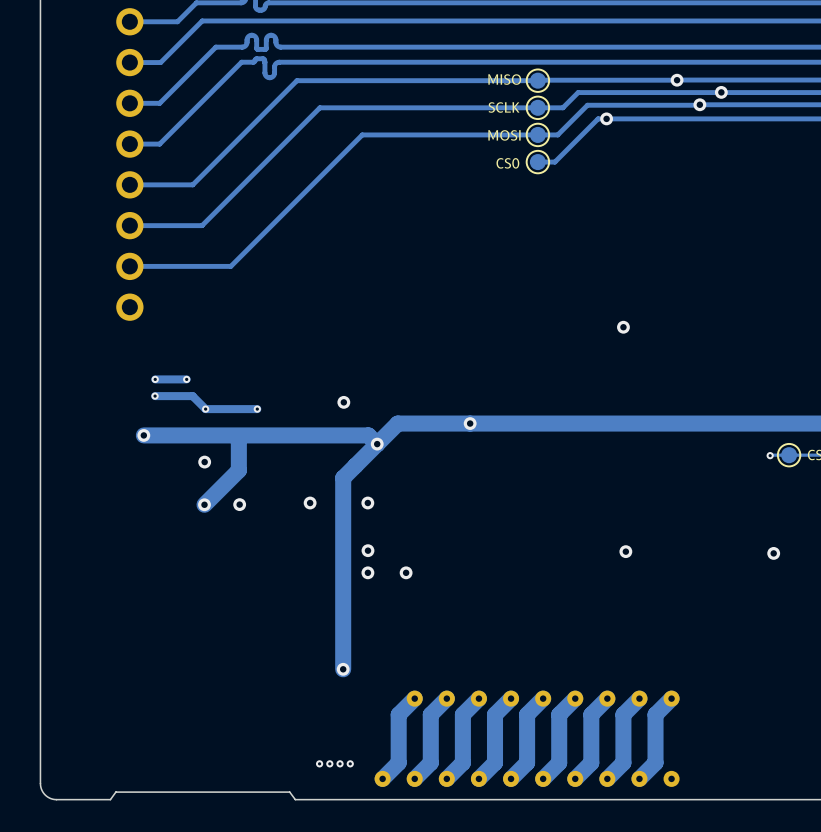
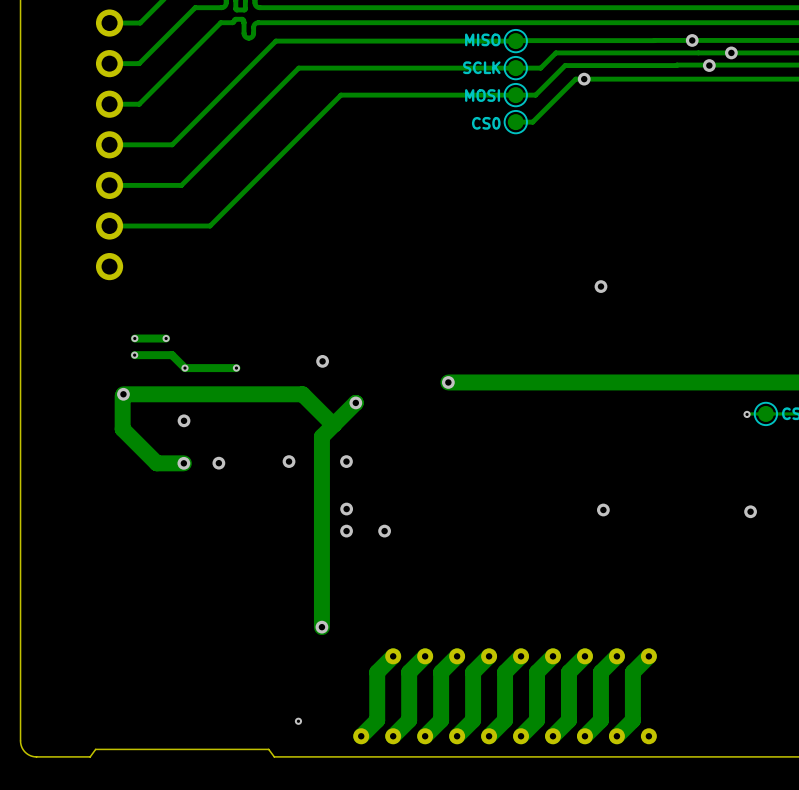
via: (677, 80) -> none
via: none -> (692, 40)
via: (721, 92) -> none
via: none -> (731, 52)
via: (699, 104) -> none
via: none -> (709, 65)
track: (470, 423) (397, 423) (377, 444) (368, 435) (323, 435) -> (334, 424) (302, 394)
track: (238, 436) (238, 470) (204, 504) -> (122, 395) (122, 429) (156, 463) (183, 463)
via: (329, 763) -> none
via: (340, 763) -> none
via: (350, 763) -> none

